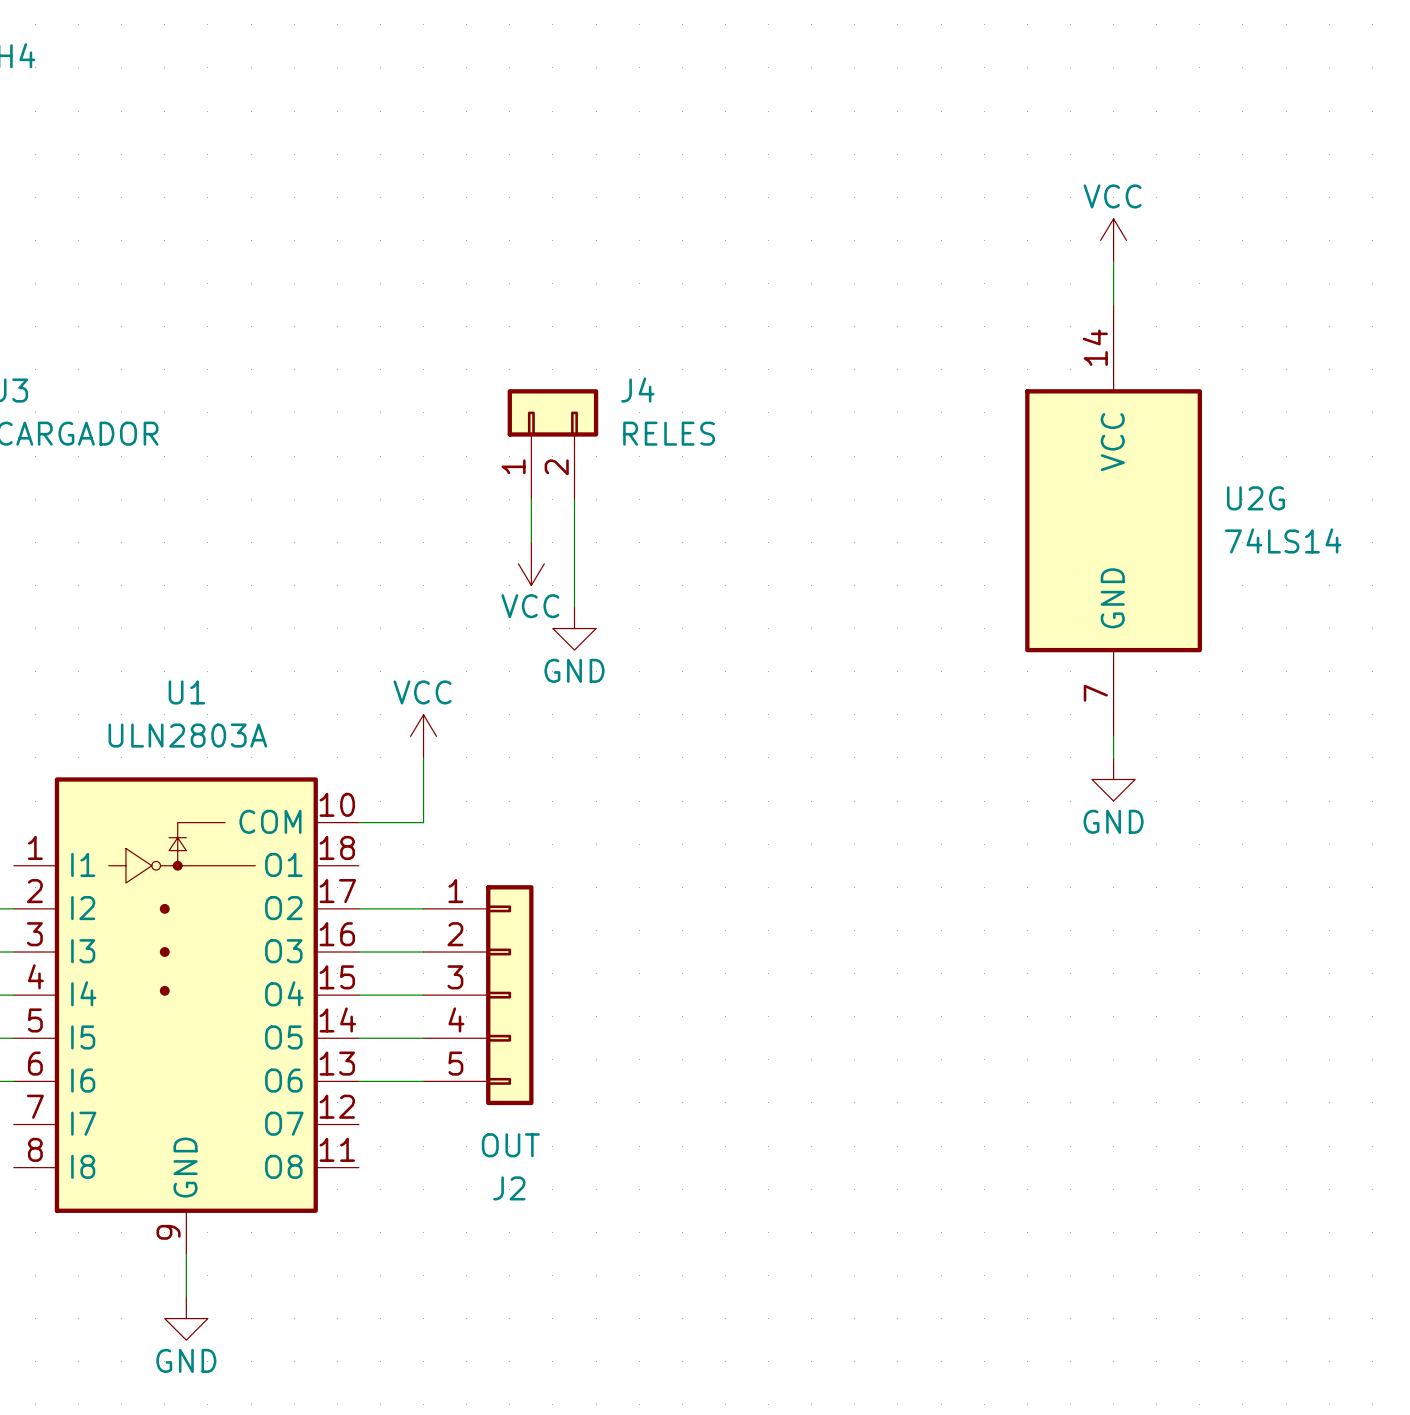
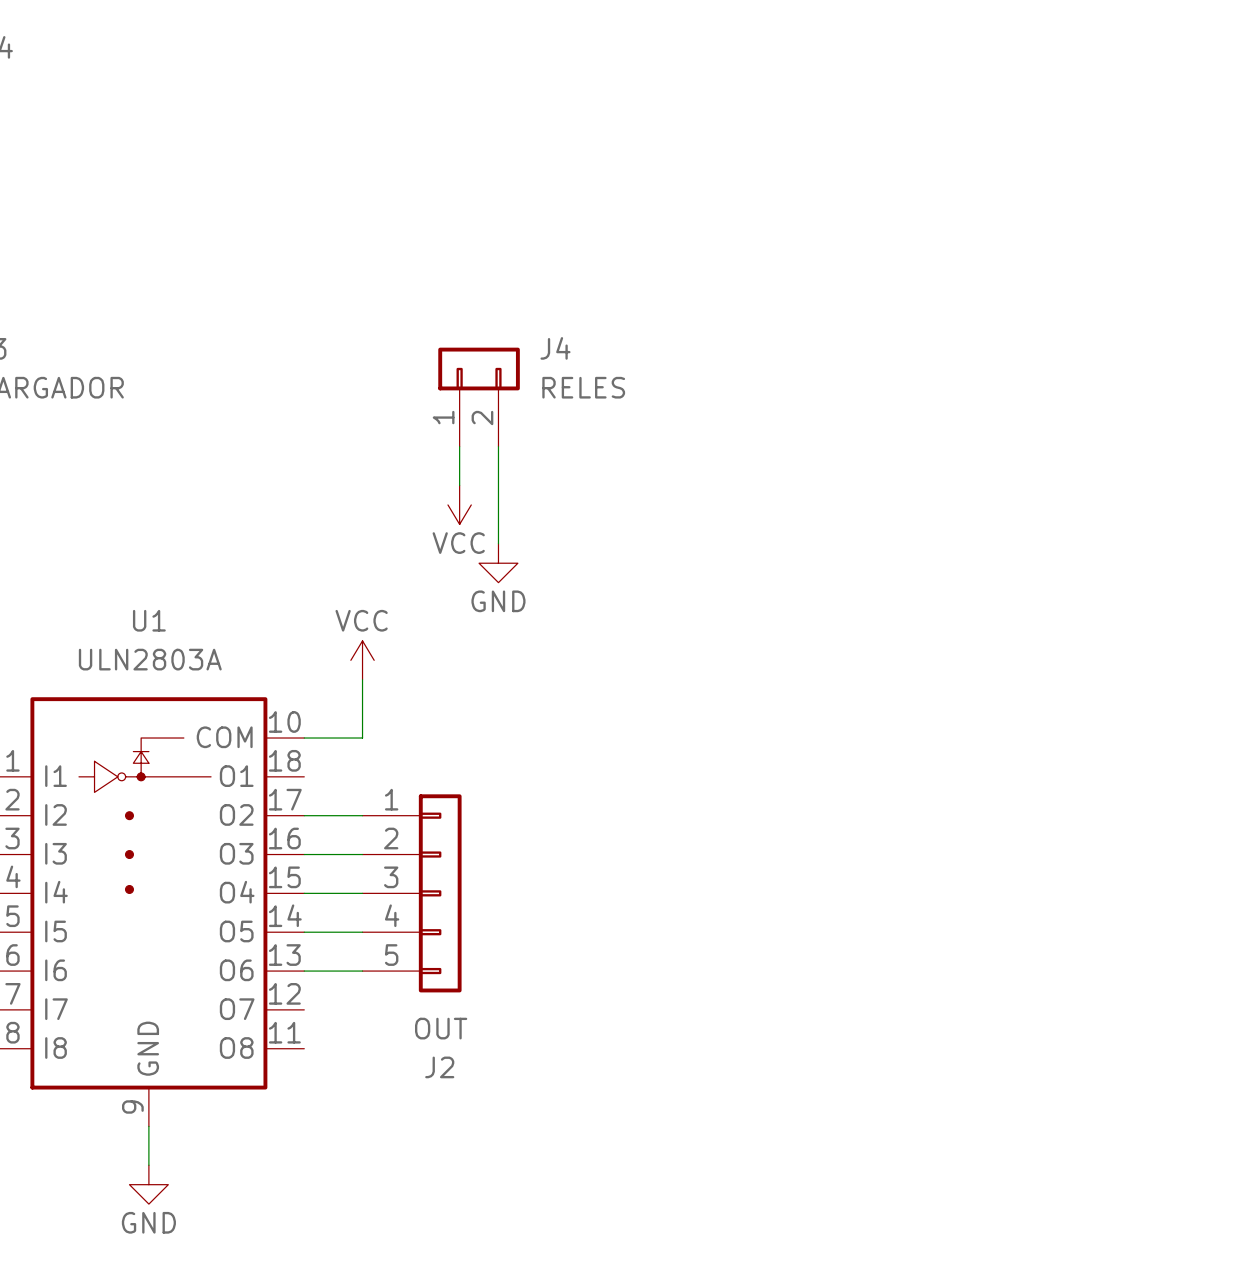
power symbol: VCC (1113, 240) -> none
wire: (1113, 261) (1113, 305) -> none
U2G: 74LS14 (1113, 520) -> none
wire: (1113, 736) (1113, 757) -> none
power symbol: GND (1113, 779) -> none

